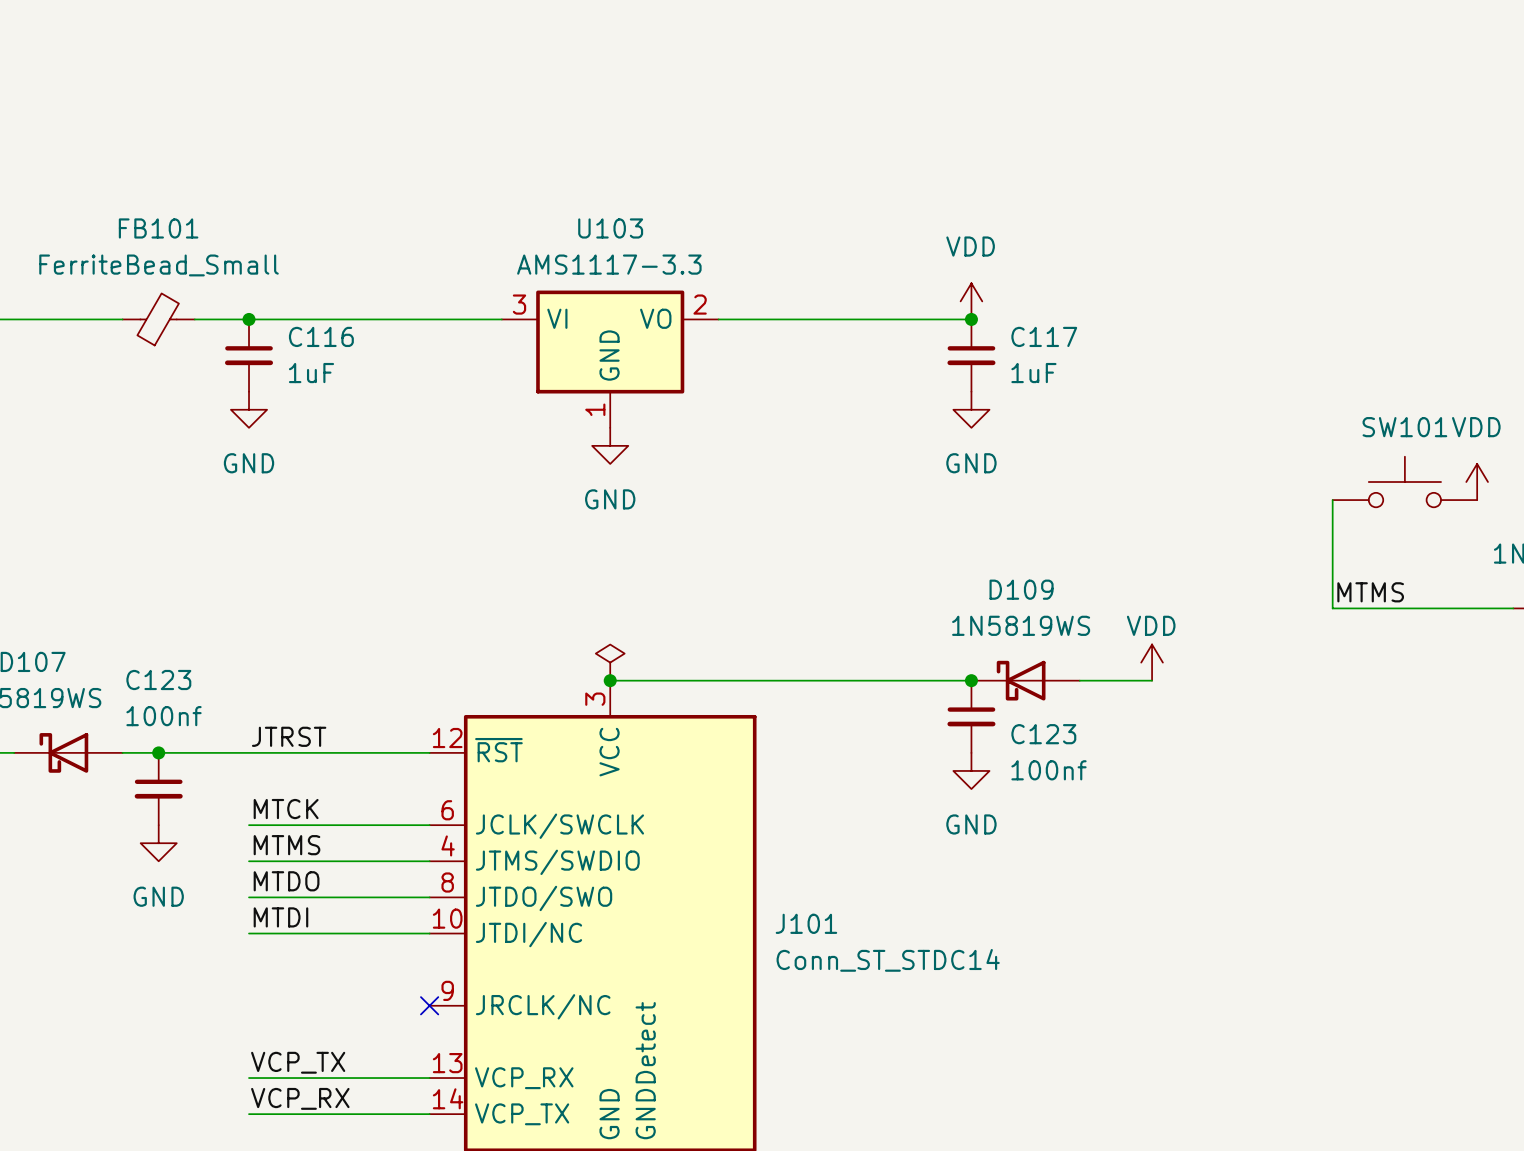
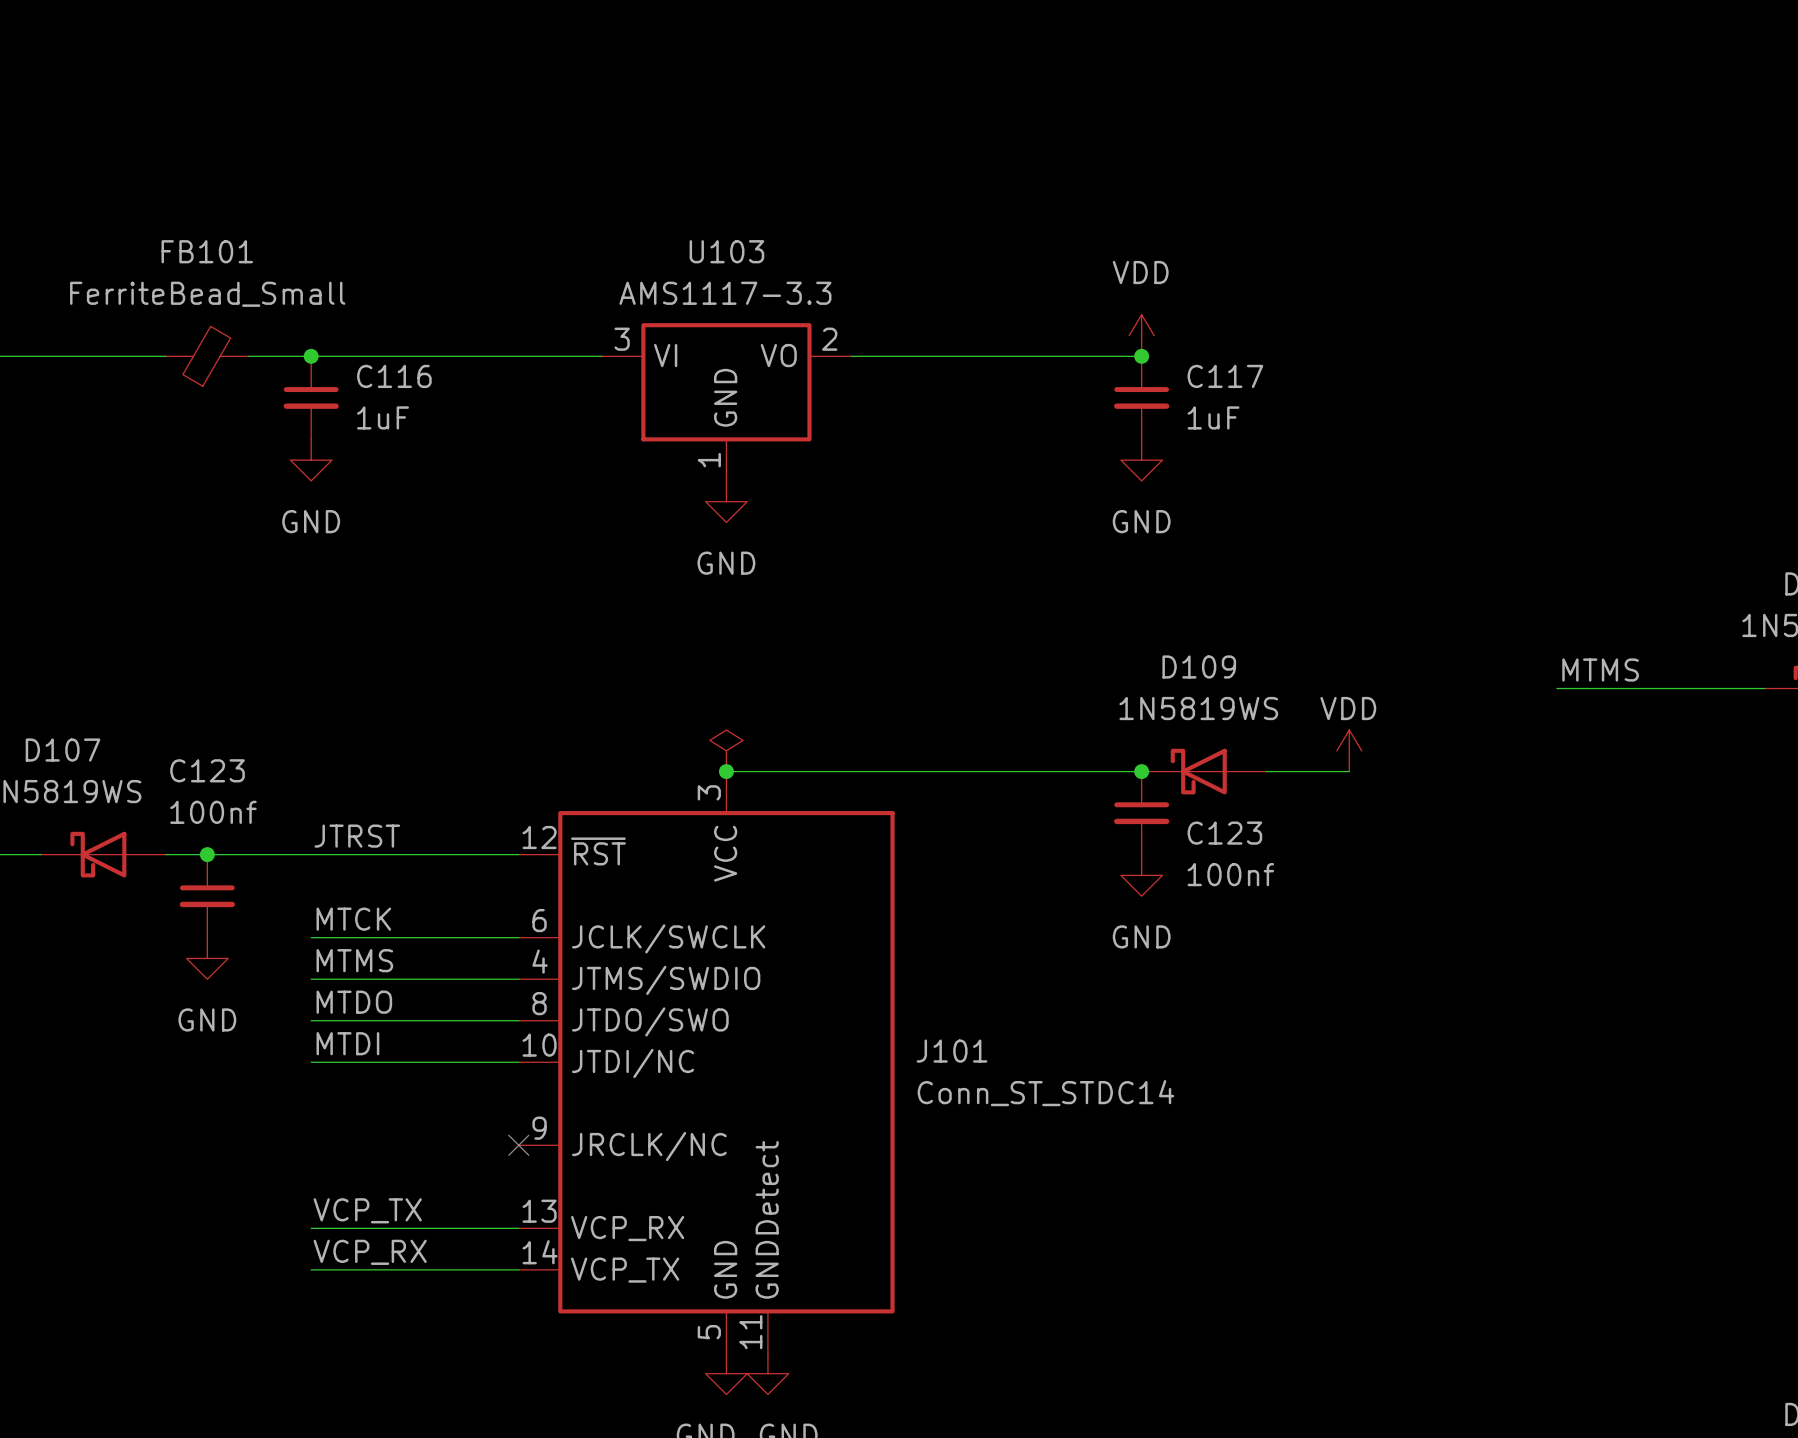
SW101: (1404, 482) -> none
power symbol: VDD (1477, 482) -> none
wire: (1332, 500) (1332, 608) -> none

